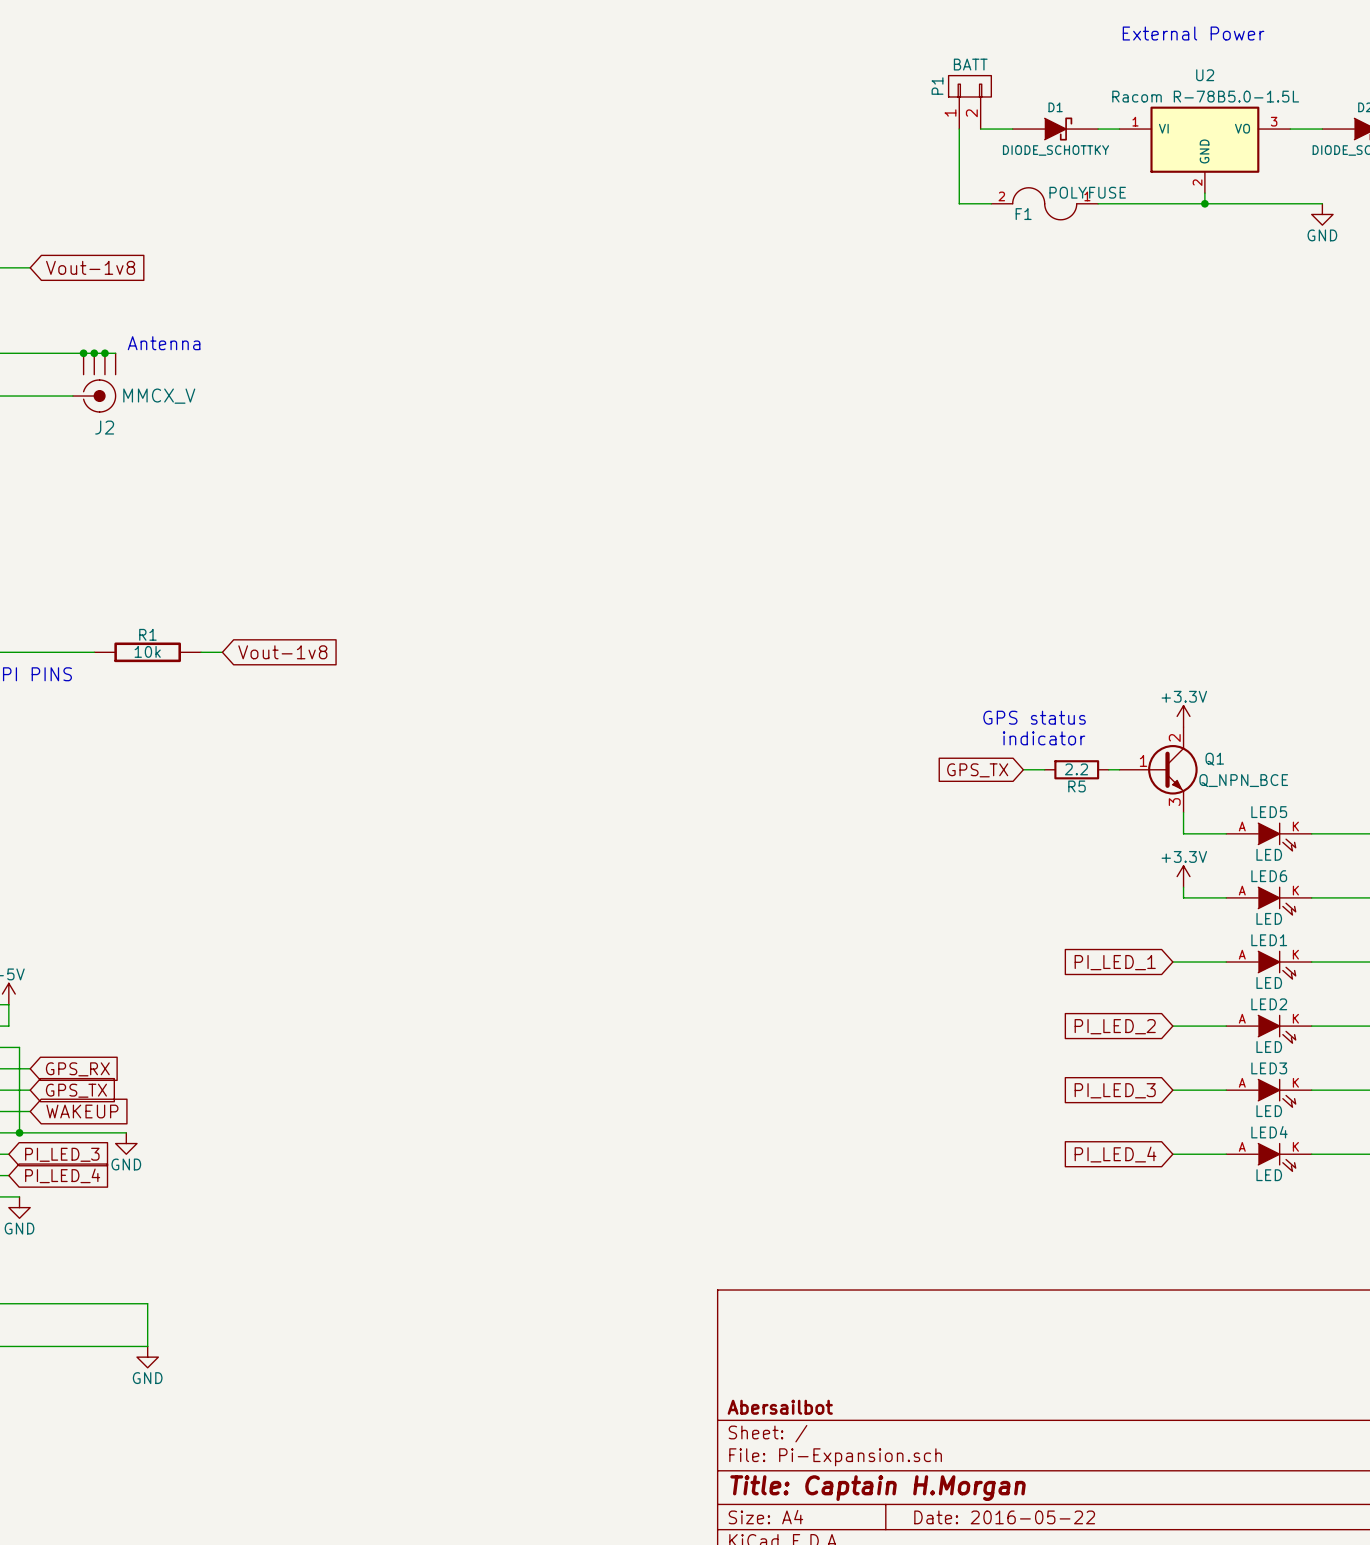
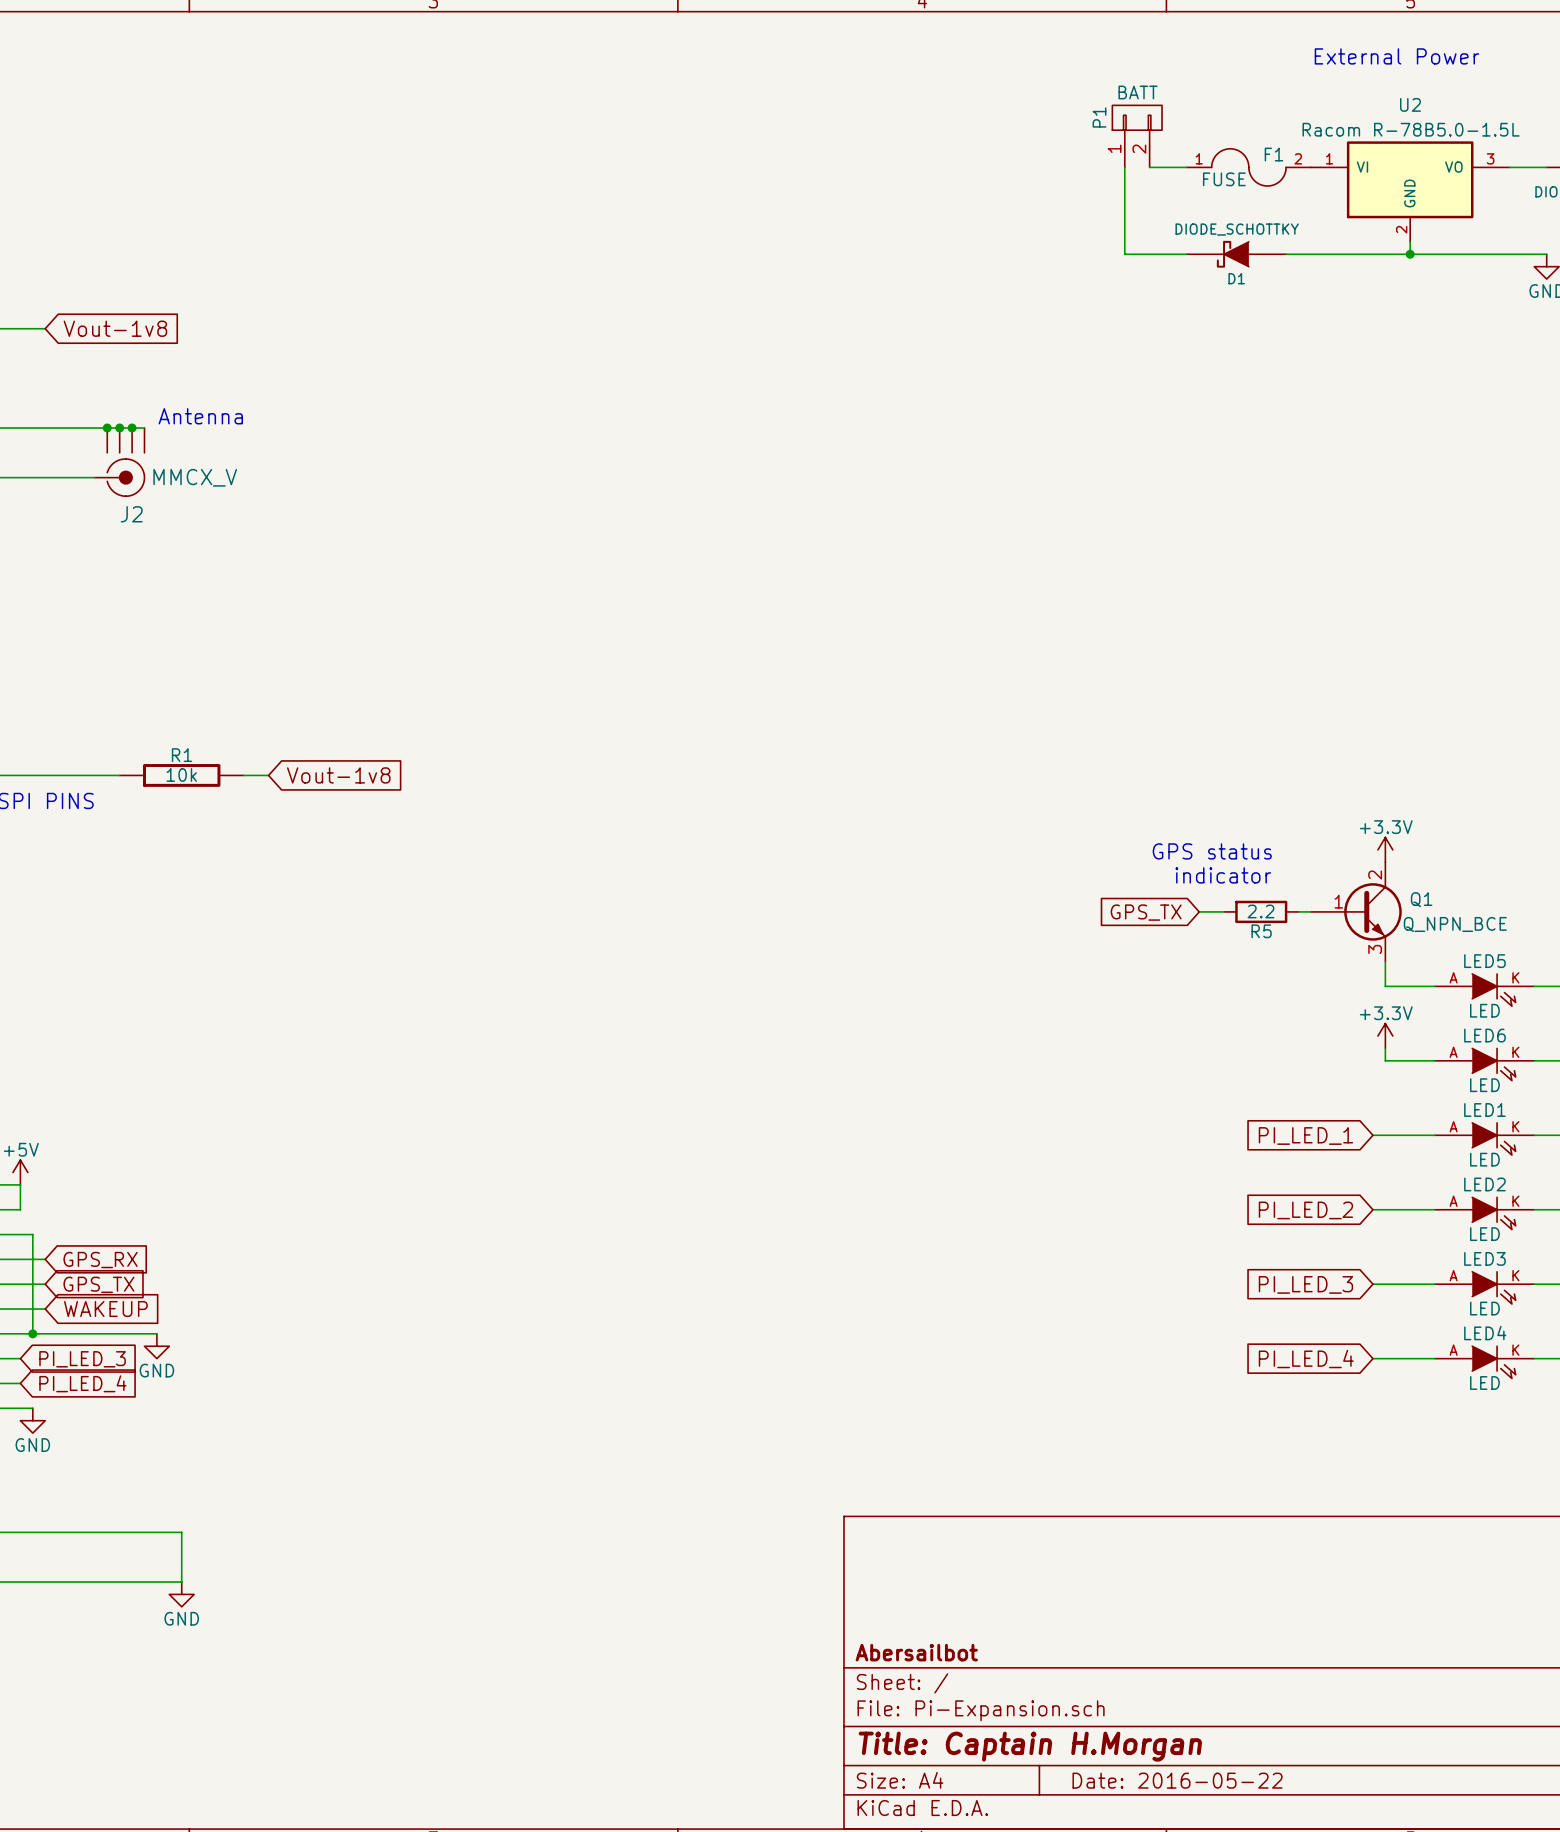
D1 position: (1055, 129) -> (1236, 254)
D1 rotation: 0° (1058, 129) -> 180° (1232, 254)
F1 value: POLYFUSE (1087, 192) -> FUSE (1224, 179)
F1 rotation: 0° (1044, 203) -> 180° (1248, 167)
F1 position: (1044, 203) -> (1248, 167)

